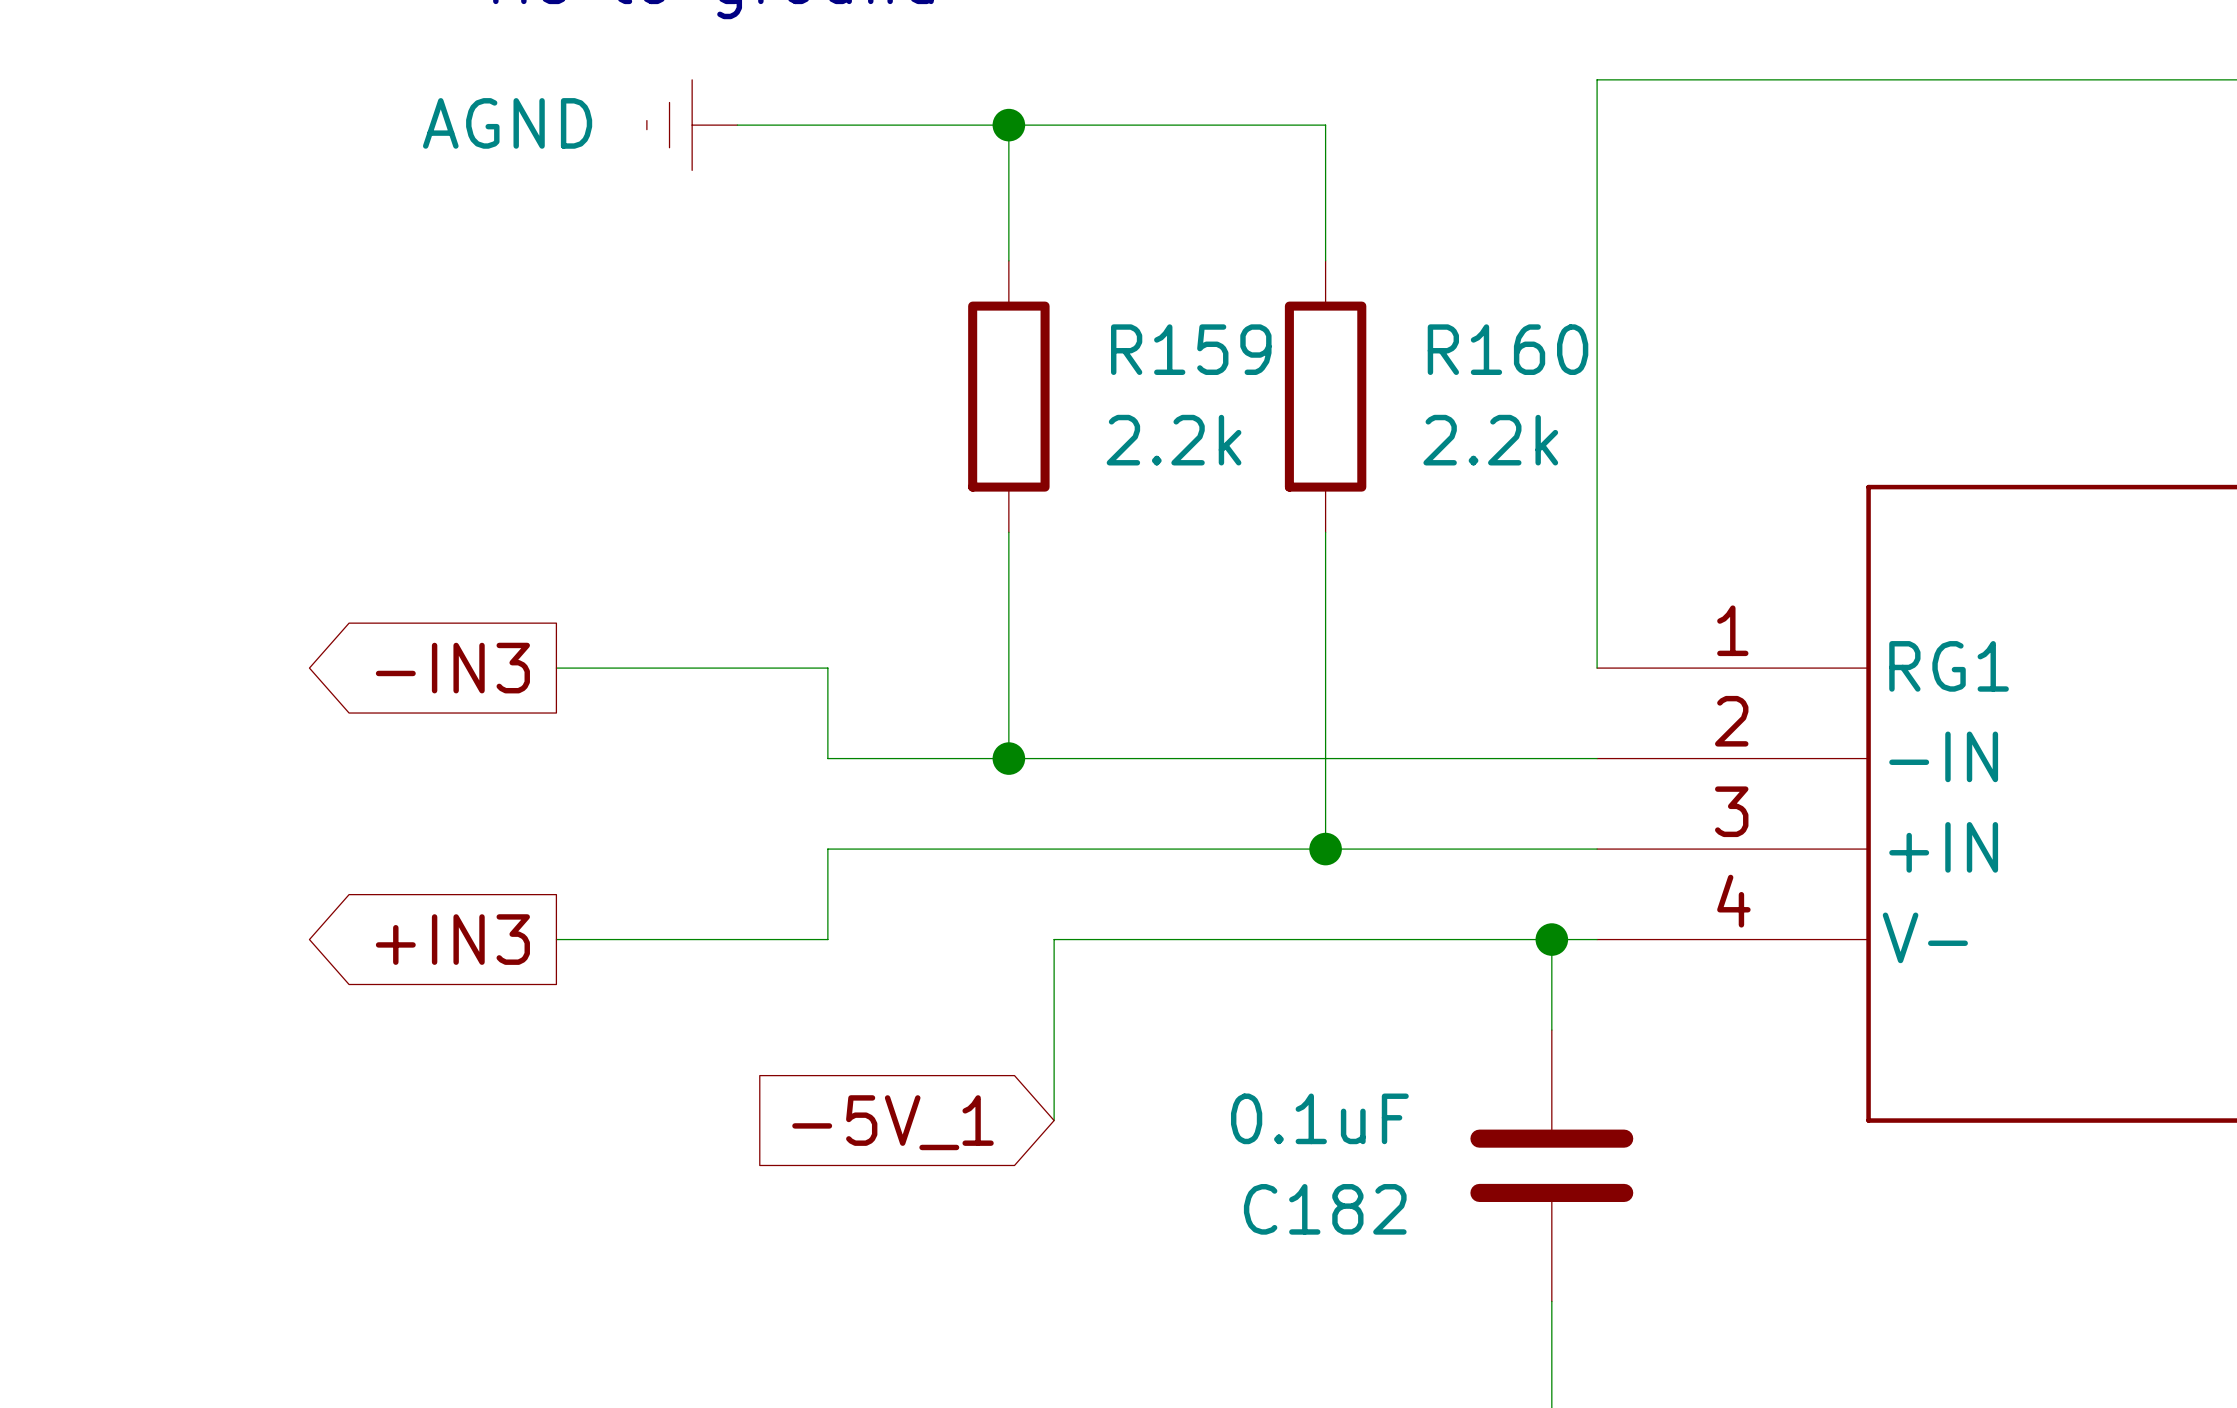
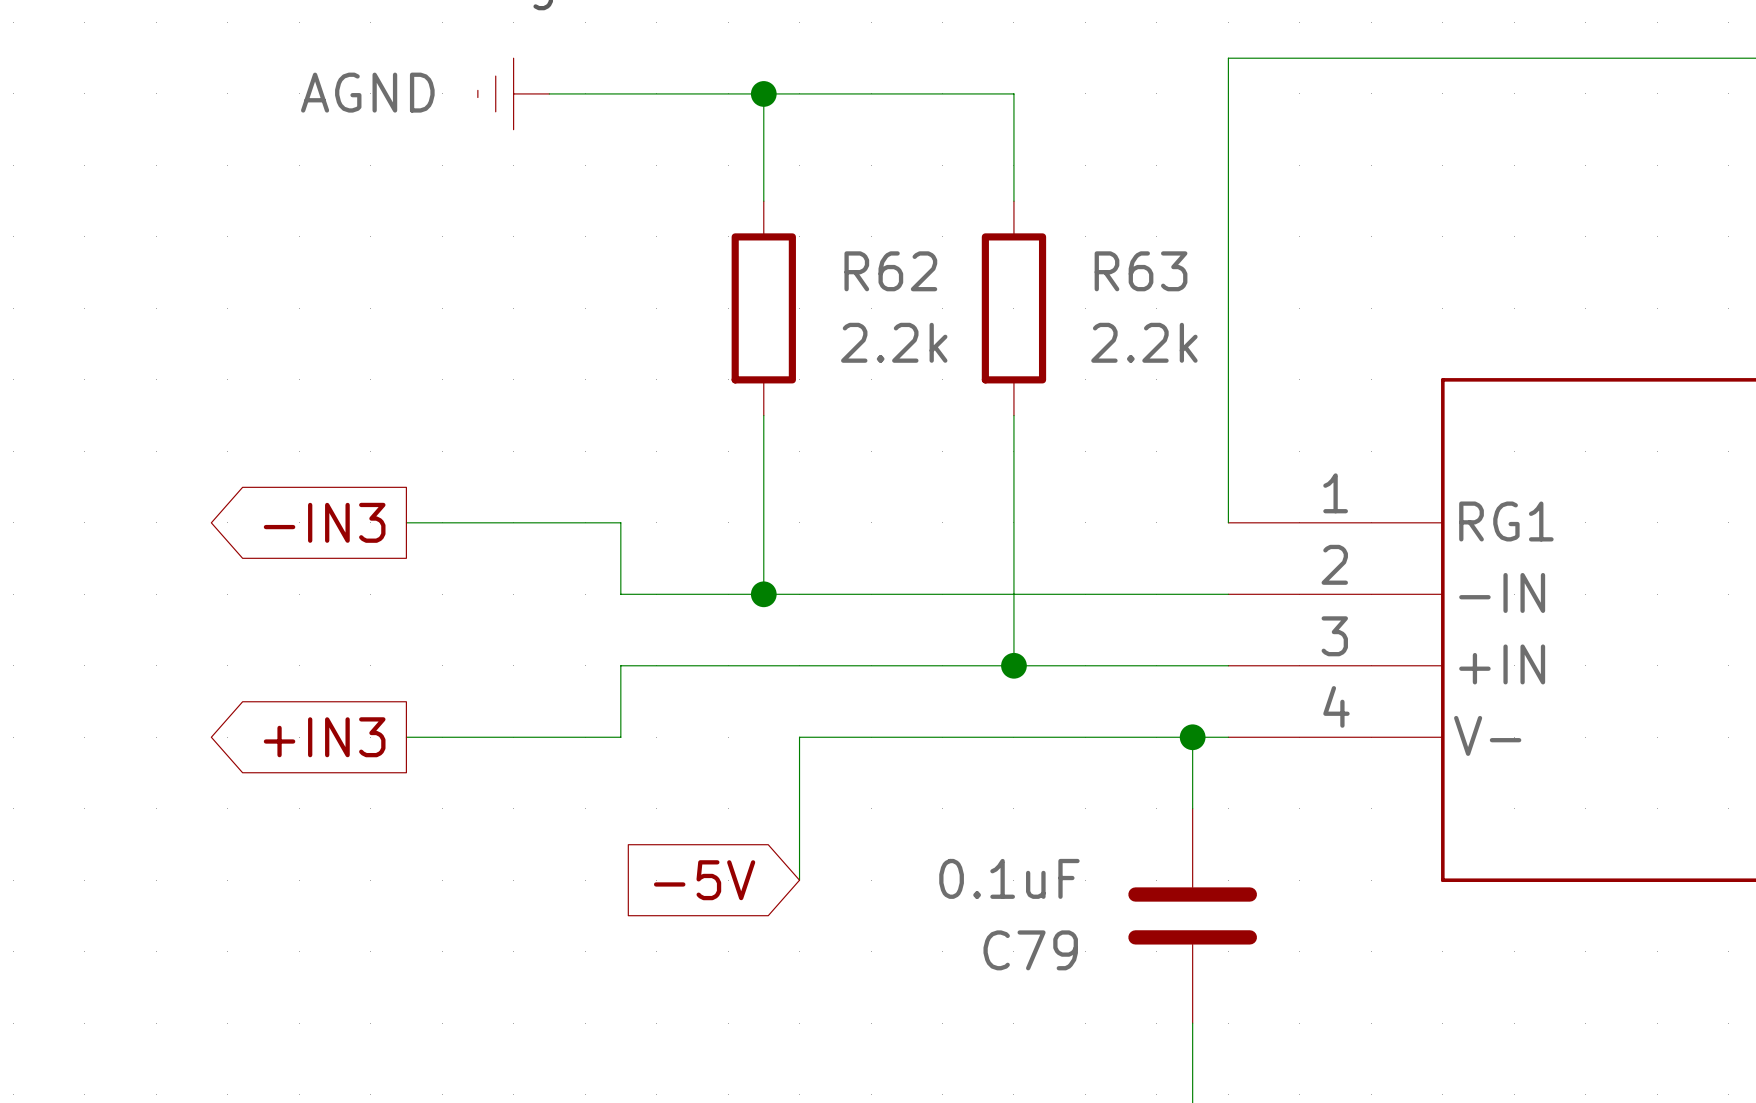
R159 name: R159 (1191, 349) -> R62 (890, 271)
R160 name: R160 (1508, 349) -> R63 (1141, 271)
global label: -5V_1 (892, 1122) -> -5V (704, 880)
C182 name: C182 (1325, 1209) -> C79 (1030, 950)

